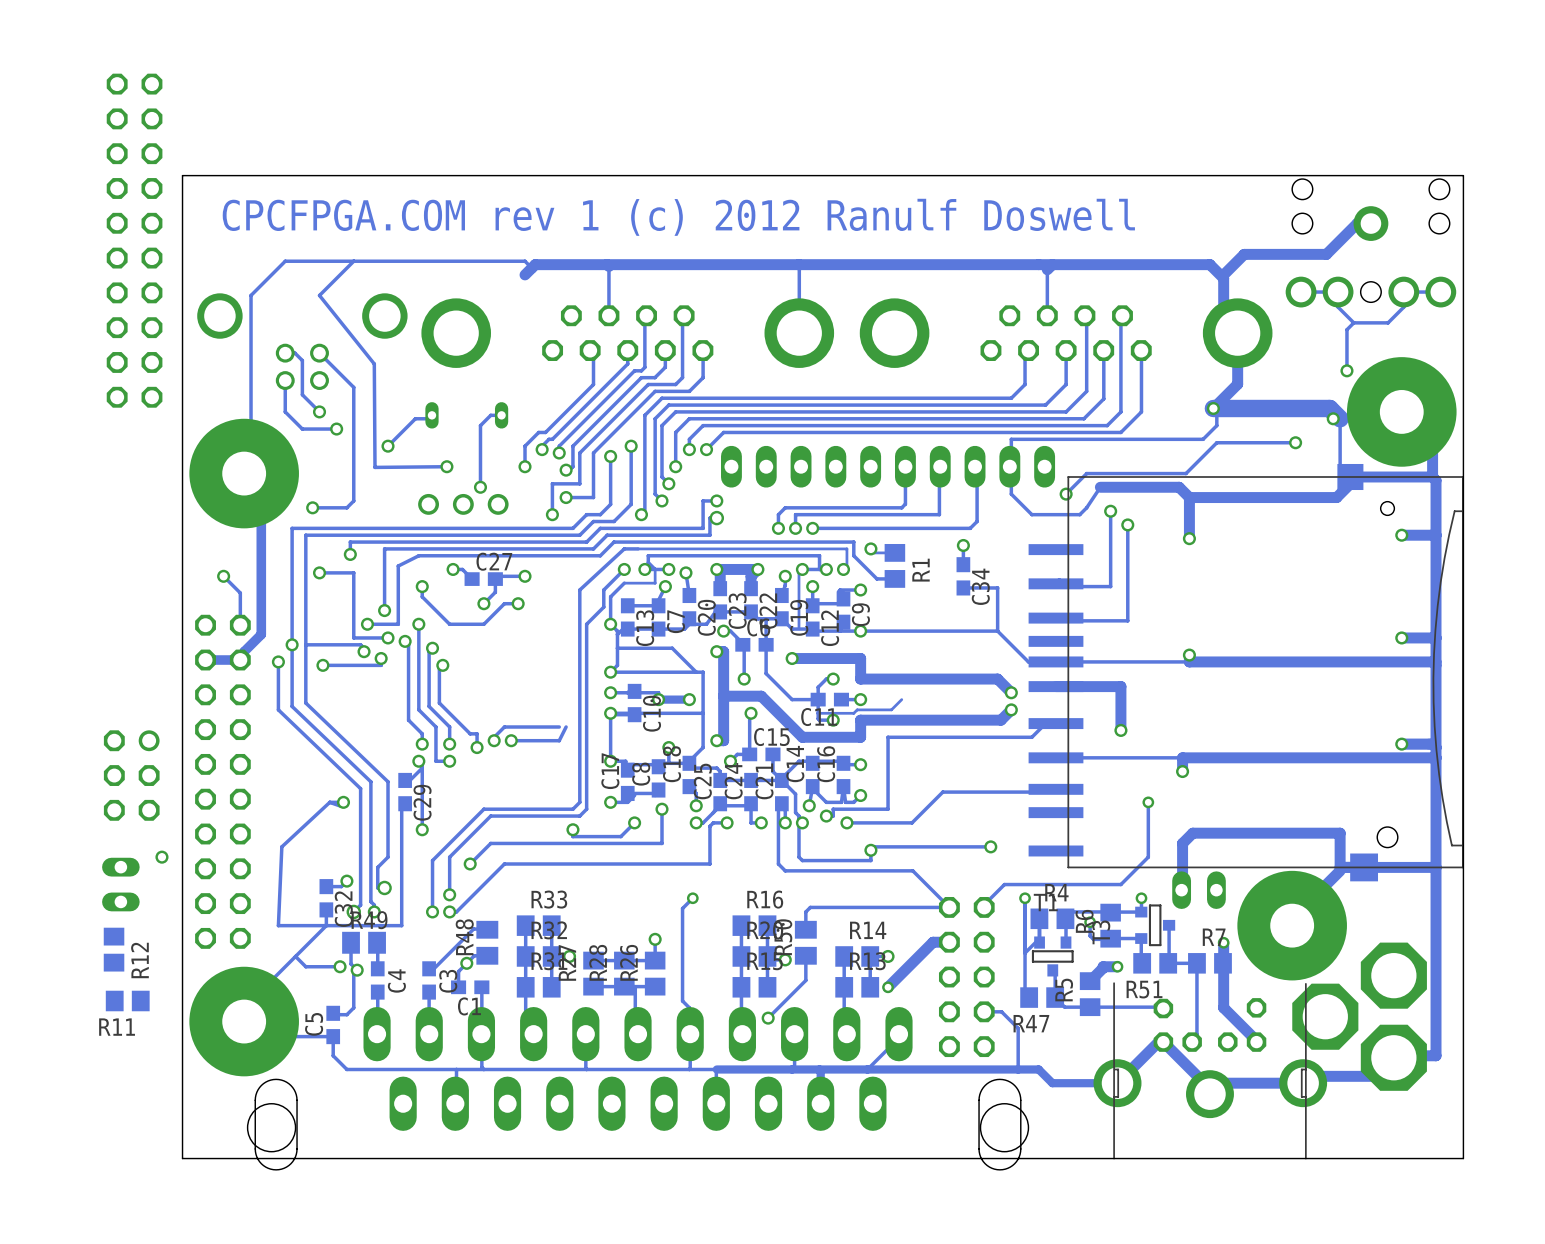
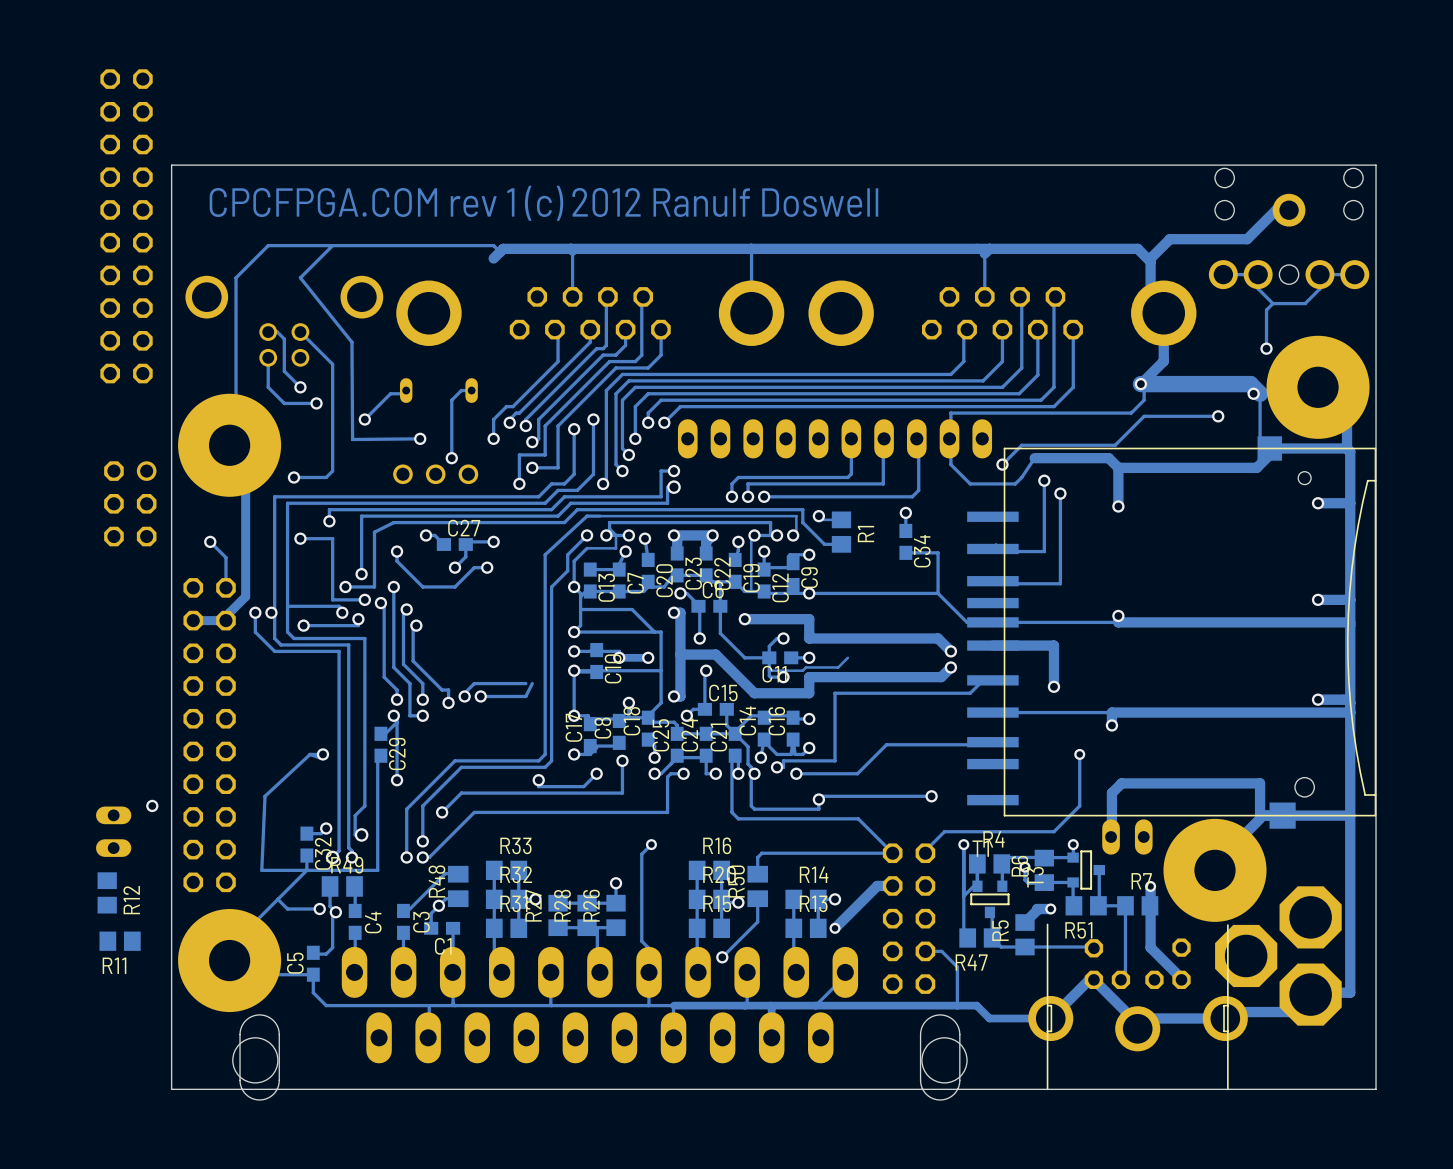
via: (292, 644) -> none
via: none -> (255, 612)
via: none -> (271, 612)
track: (278, 661) (278, 709) (360, 788) -> (255, 612) (255, 632) (274, 651) (339, 651) (339, 741)
via: (278, 661) -> none
track: (305, 672) (305, 703) (388, 781) -> (287, 632) (293, 638) (364, 638) (364, 735)
track: (292, 679) (292, 706) (370, 781) -> (274, 638) (281, 644) (348, 644) (348, 735)
part position: (131, 775) -> (130, 503)

